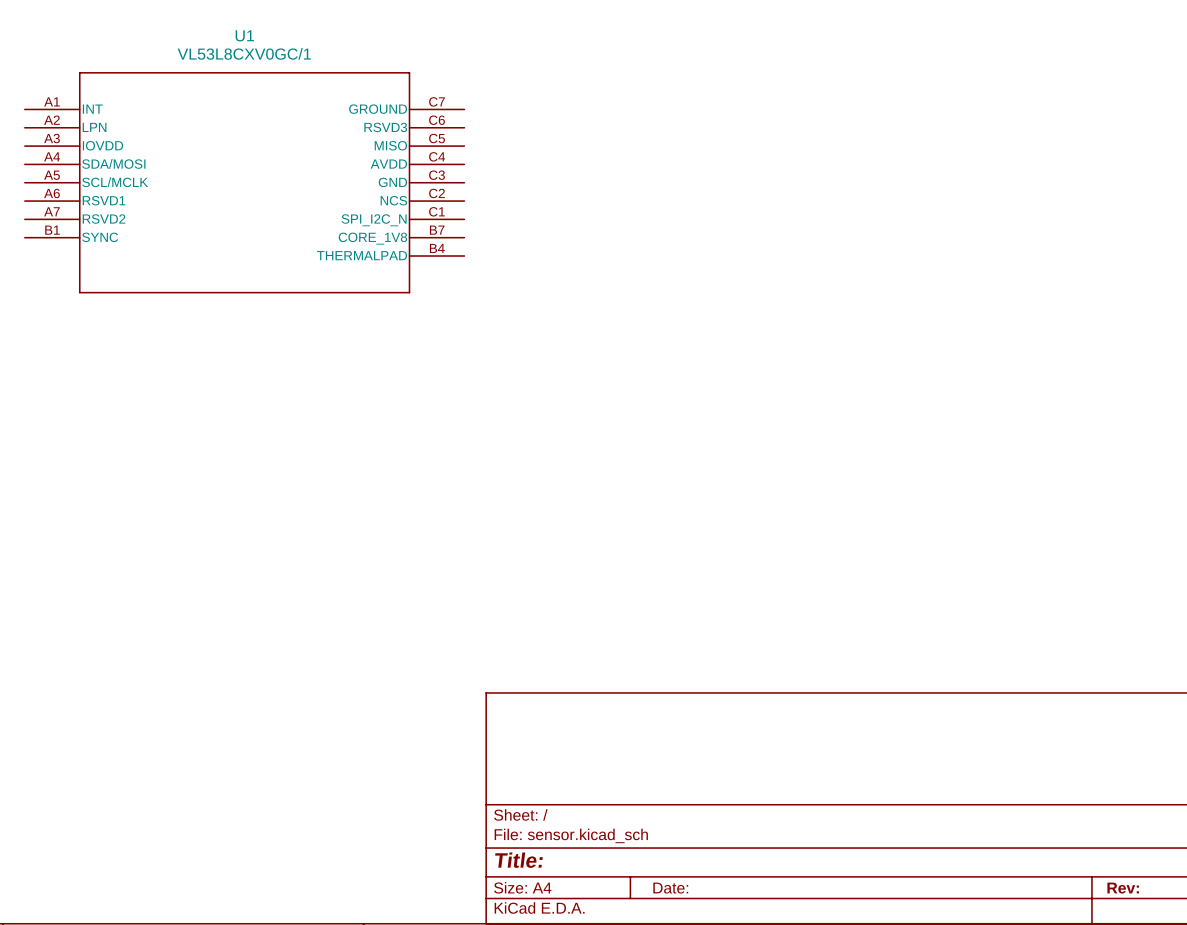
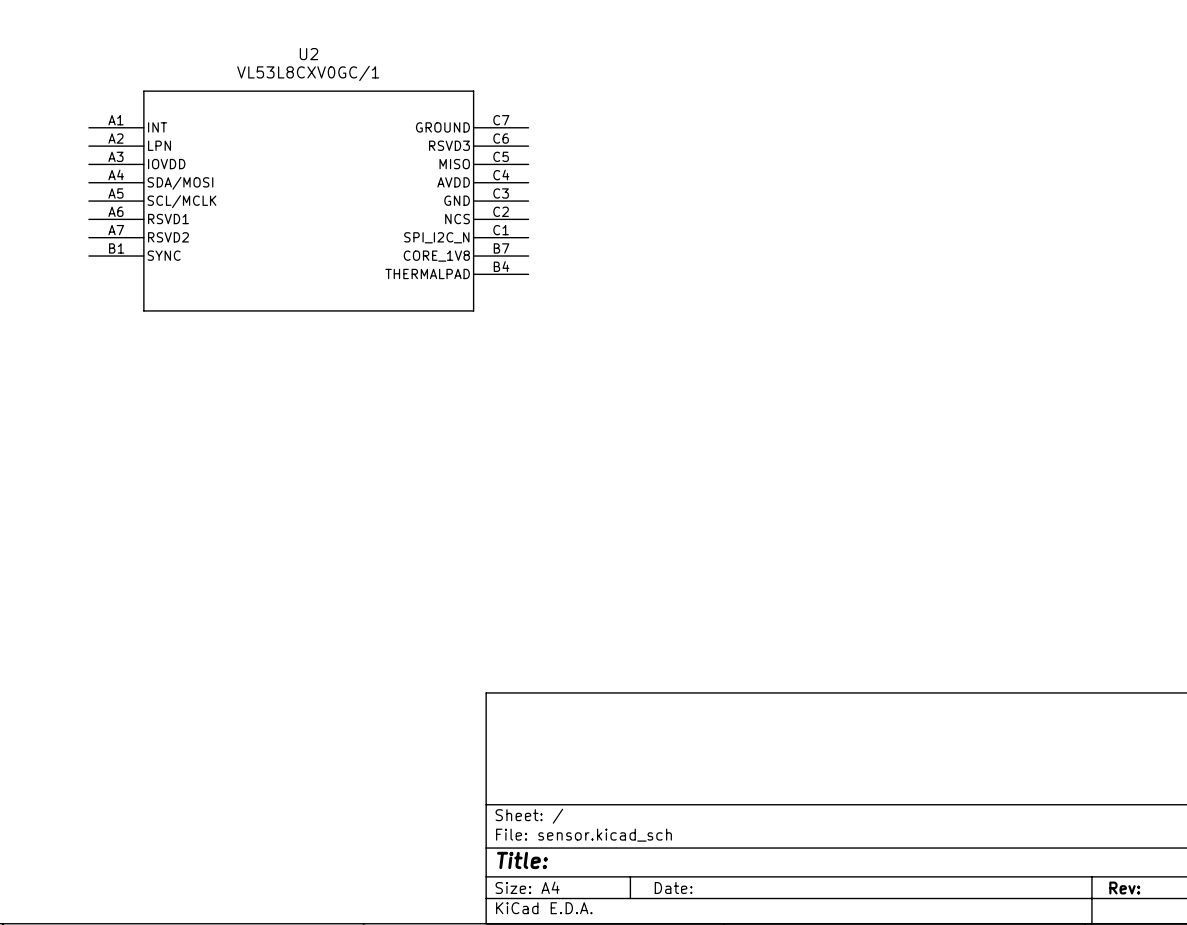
U1: VL53L8CXV0GC/1 (244, 182) -> none
U2: none -> VL53L8CXV0GC/1 (308, 201)

